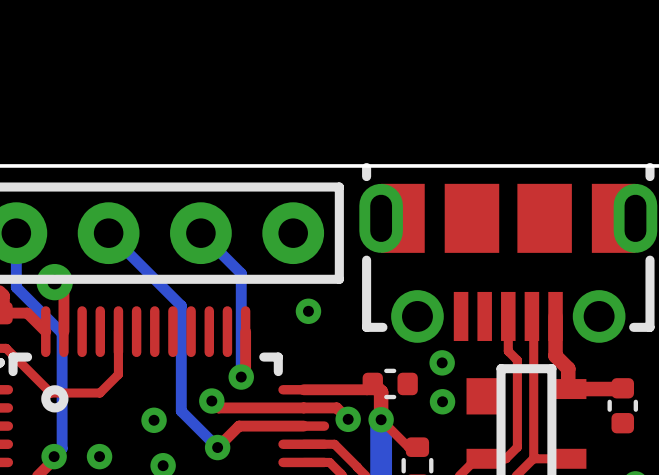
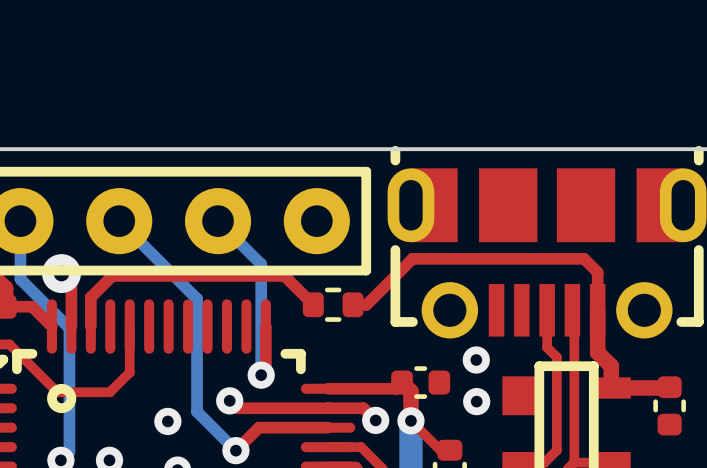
top track: none -> (313, 304) (284, 275) (112, 275) (90, 297) (90, 326)
via: (308, 311) -> none
part: none -> (333, 304)
top track: none -> (353, 304) (366, 304) (412, 258) (584, 258) (597, 272) (597, 310)

